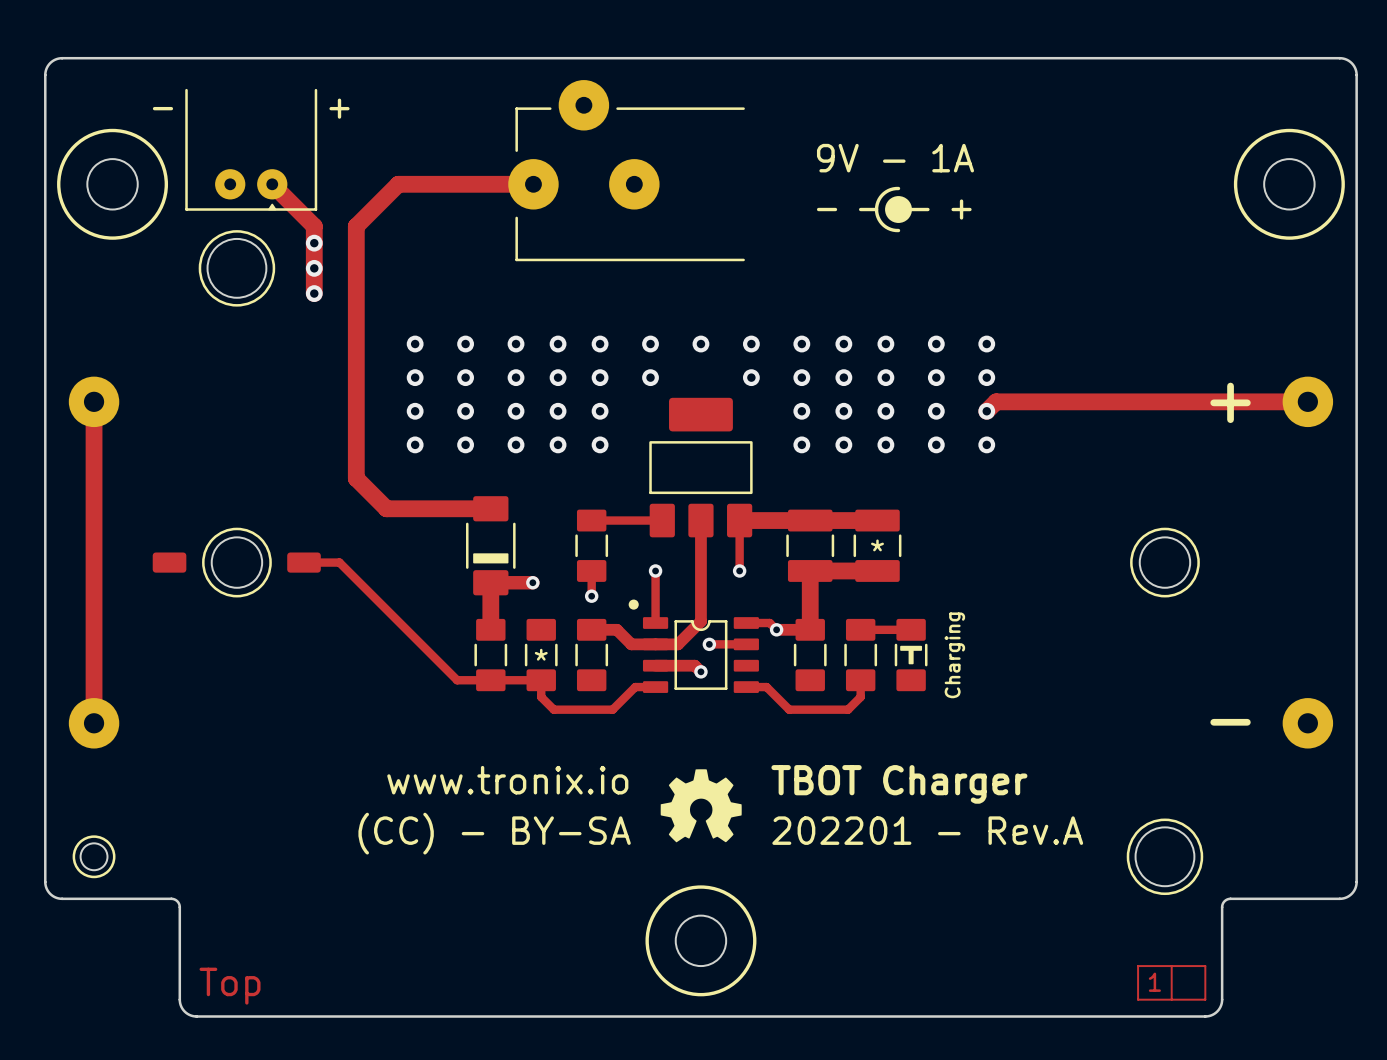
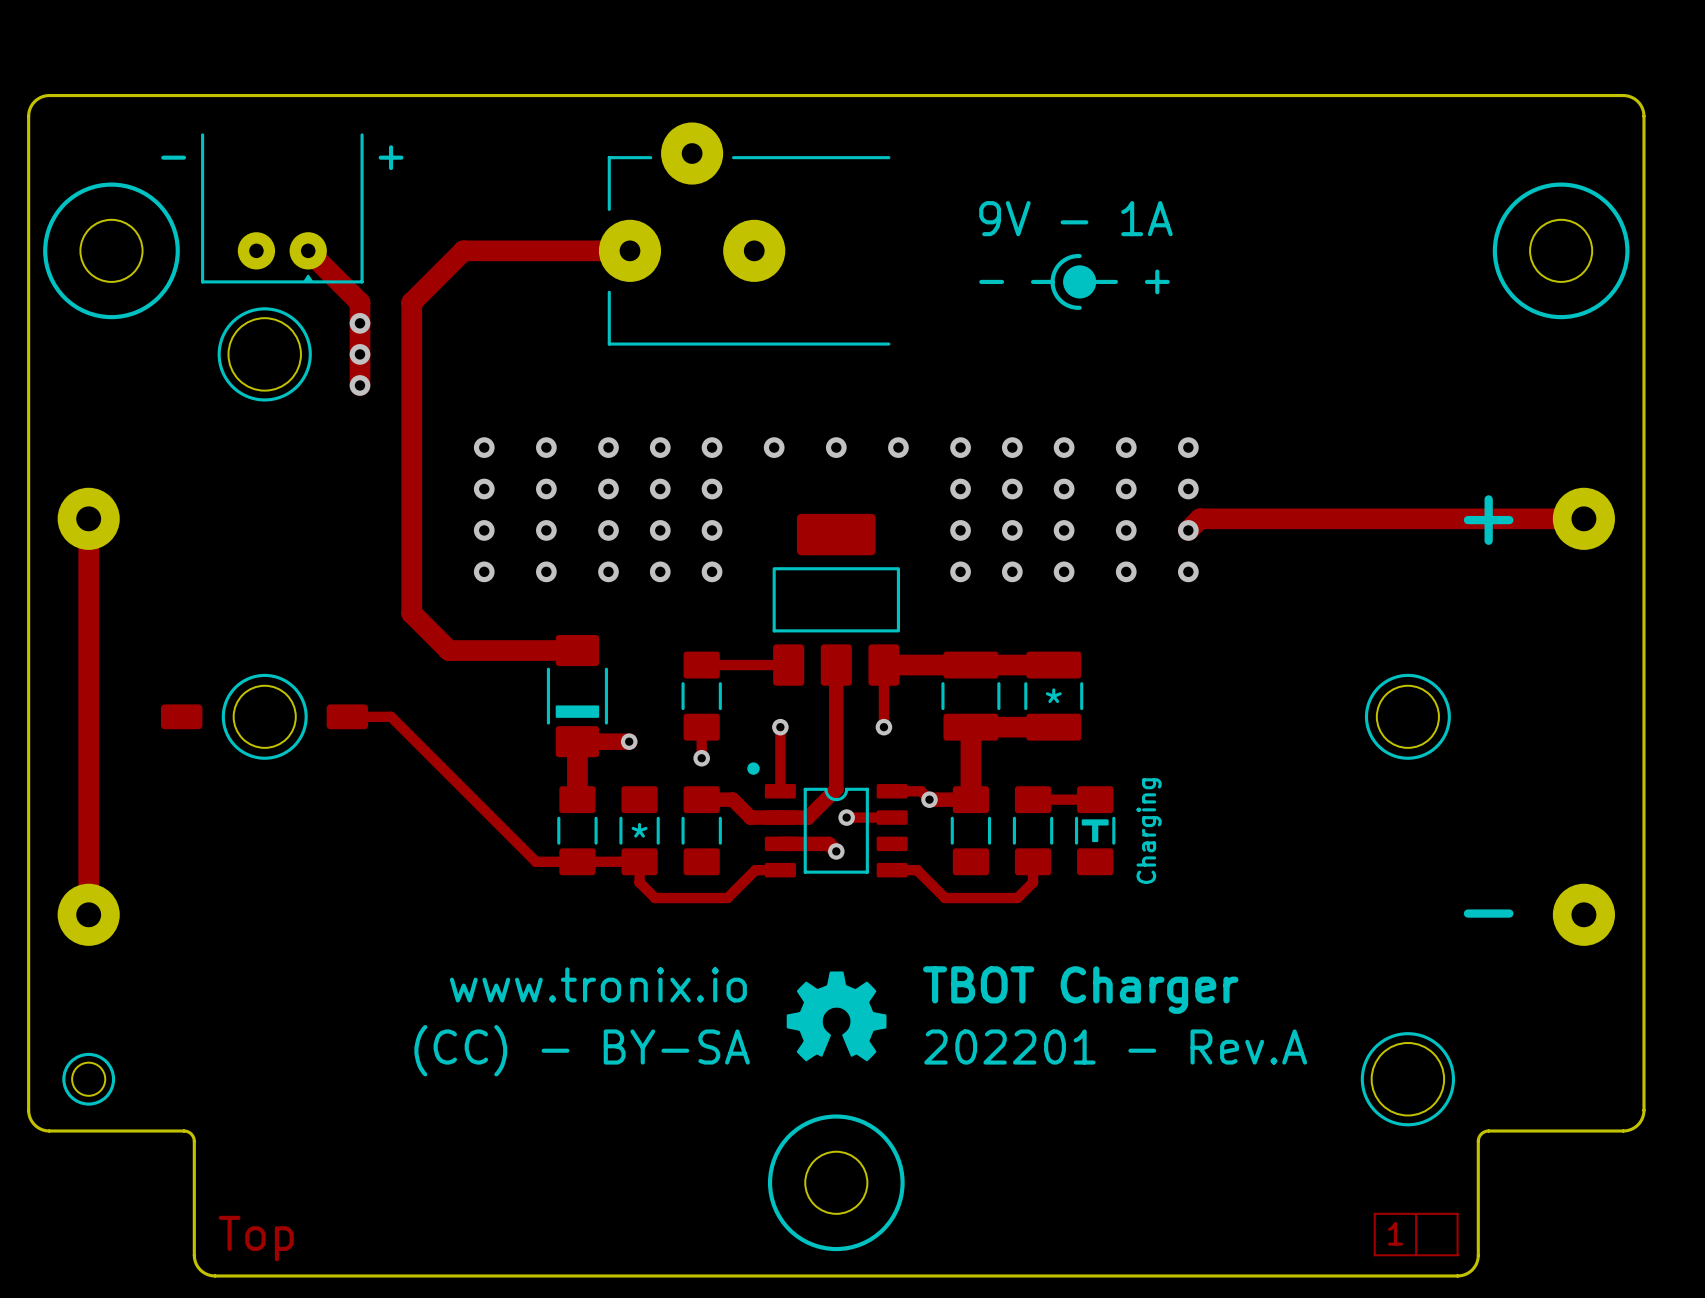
via: (650, 377) -> none
via: (751, 377) -> none

